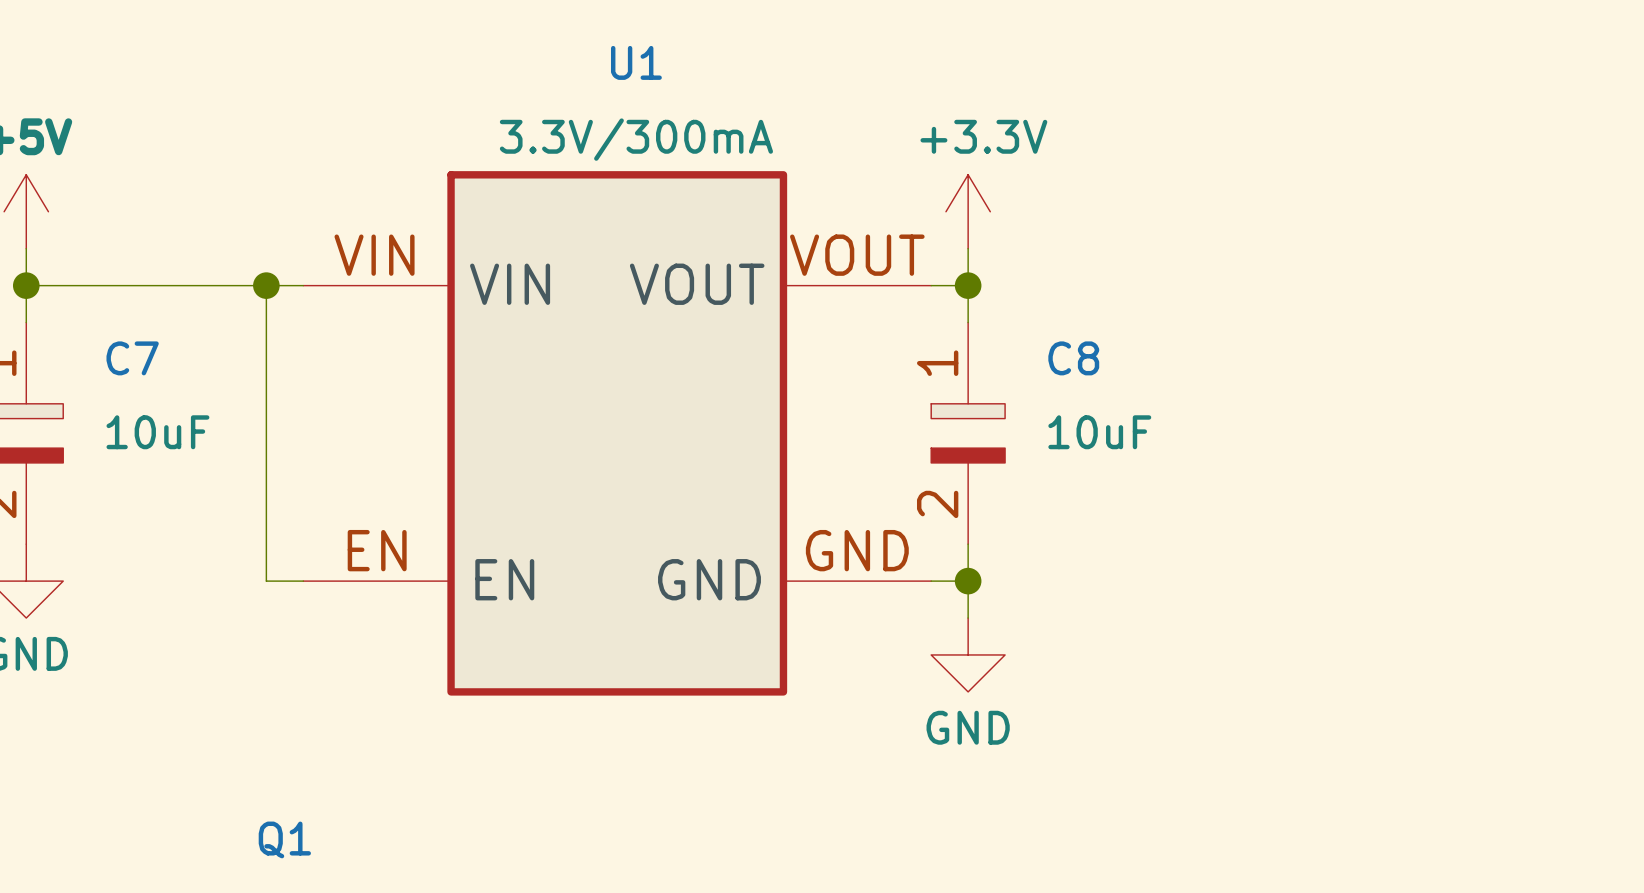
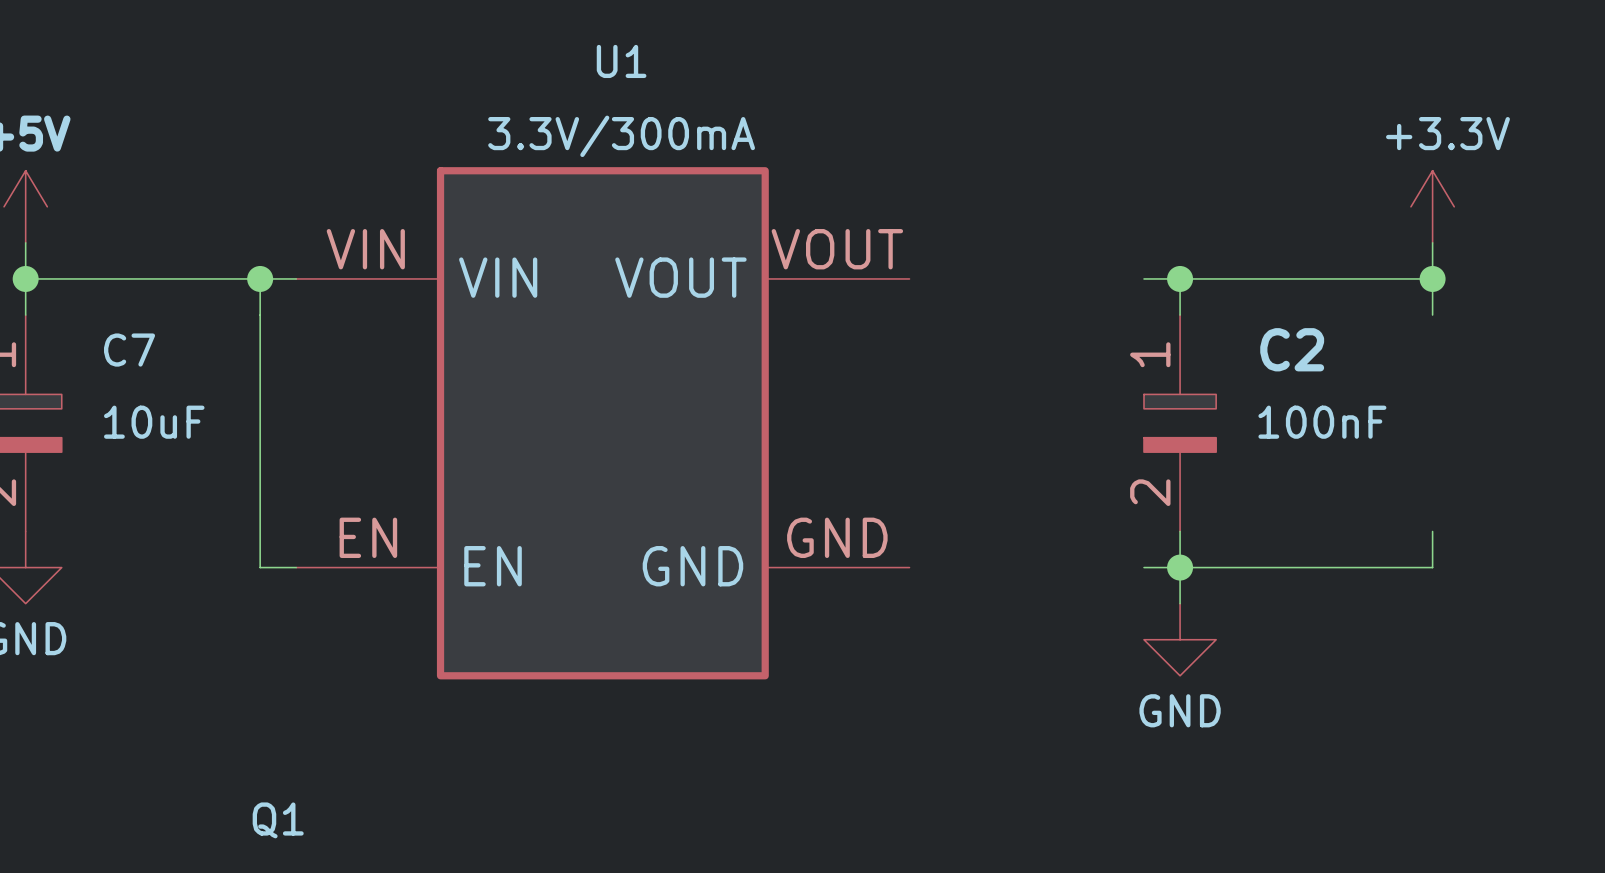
power symbol position: +3.3V (968, 211) -> +3.3V (1432, 206)
wire: (968, 248) (968, 322) -> (1432, 242) (1432, 315)
wire: (931, 285) (968, 285) -> none
junction: (968, 285) -> none
wire: none -> (1143, 278) (1432, 278)
wire: none -> (1180, 278) (1180, 315)
junction: none -> (1180, 278)
junction: none -> (1432, 278)
C8: 10uF (968, 433) -> none
C2: none -> 100nF (1180, 423)
wire: (968, 544) (968, 618) -> (1180, 531) (1180, 603)
wire: none -> (1432, 531) (1432, 567) (1143, 567)
wire: (931, 581) (968, 581) -> none
junction: (968, 581) -> none
junction: none -> (1180, 567)
power symbol position: GND (968, 654) -> GND (1180, 639)

